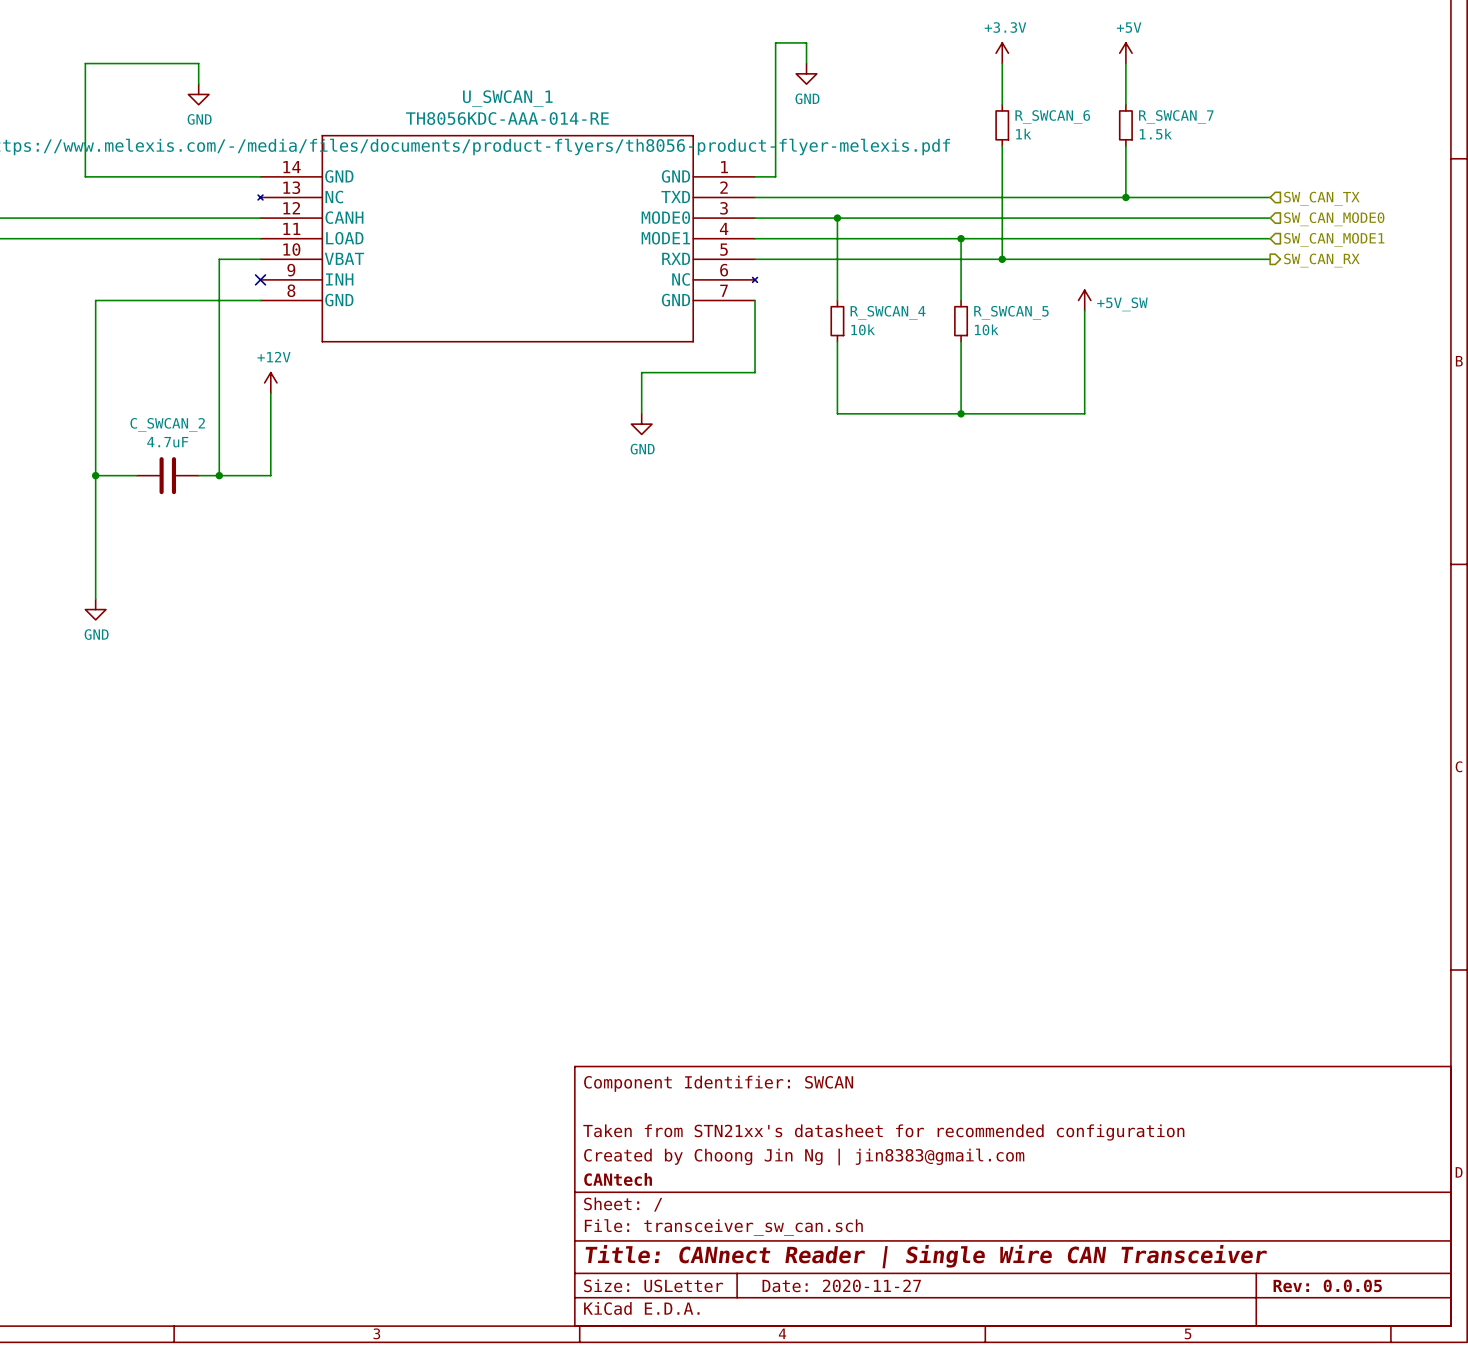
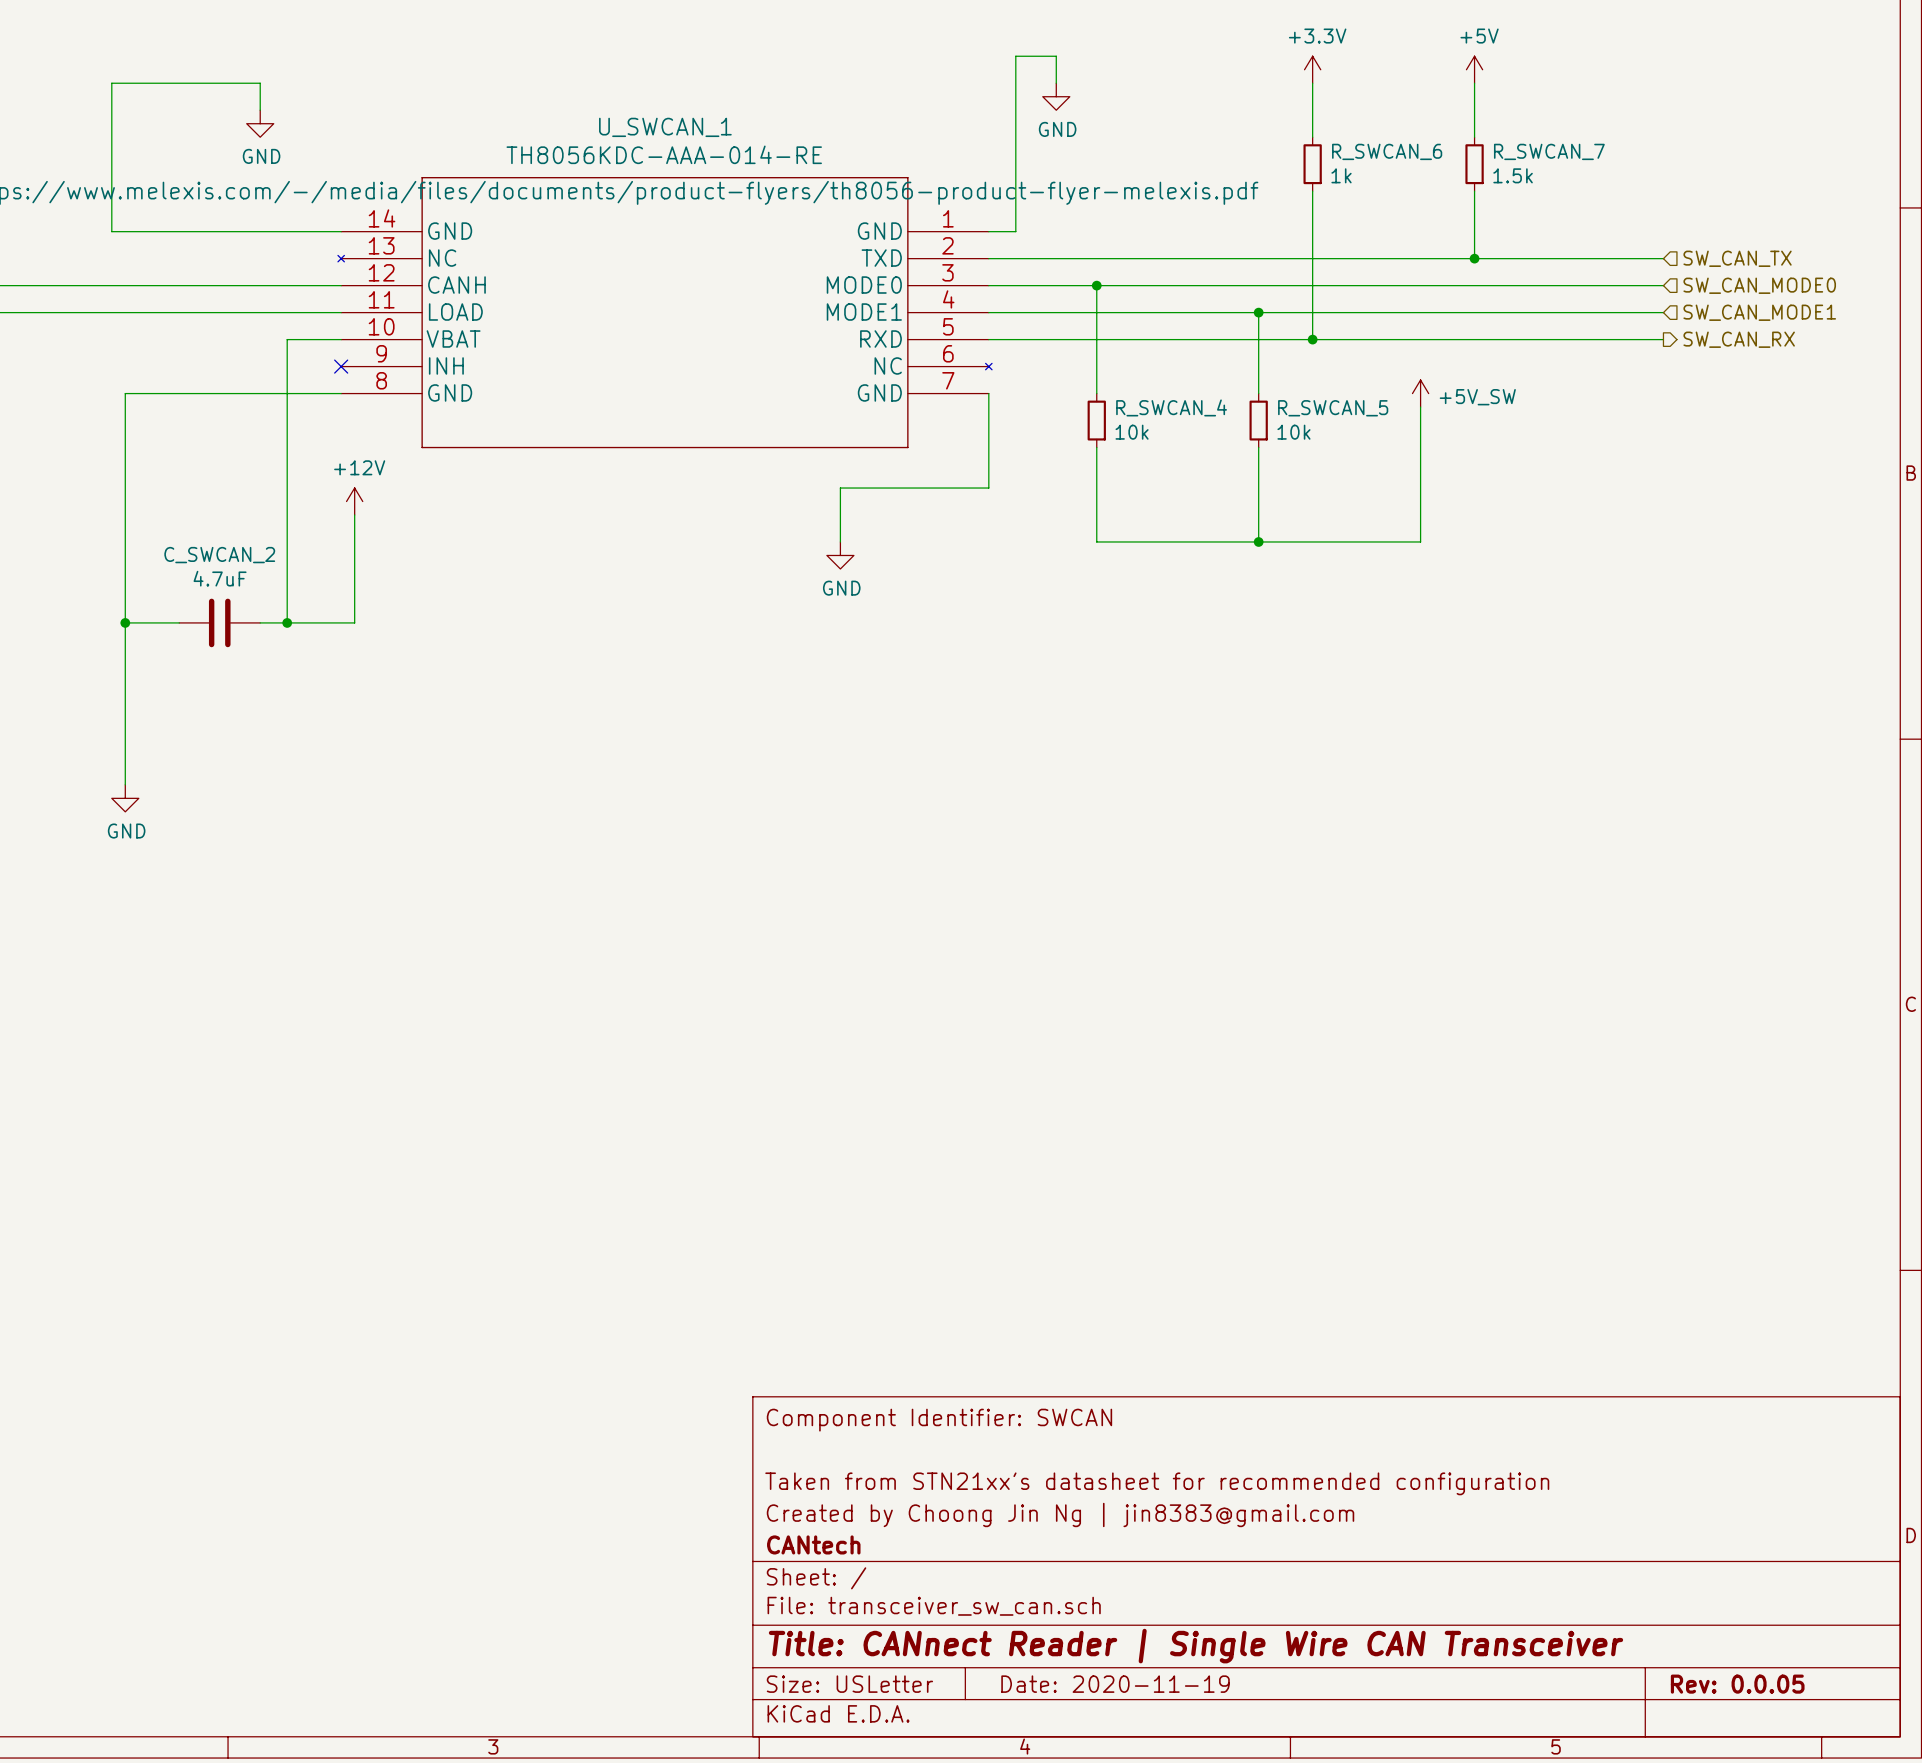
title block: Date: 2020-11-27 (841, 1285) -> Date: 2020-11-19 (1115, 1684)

